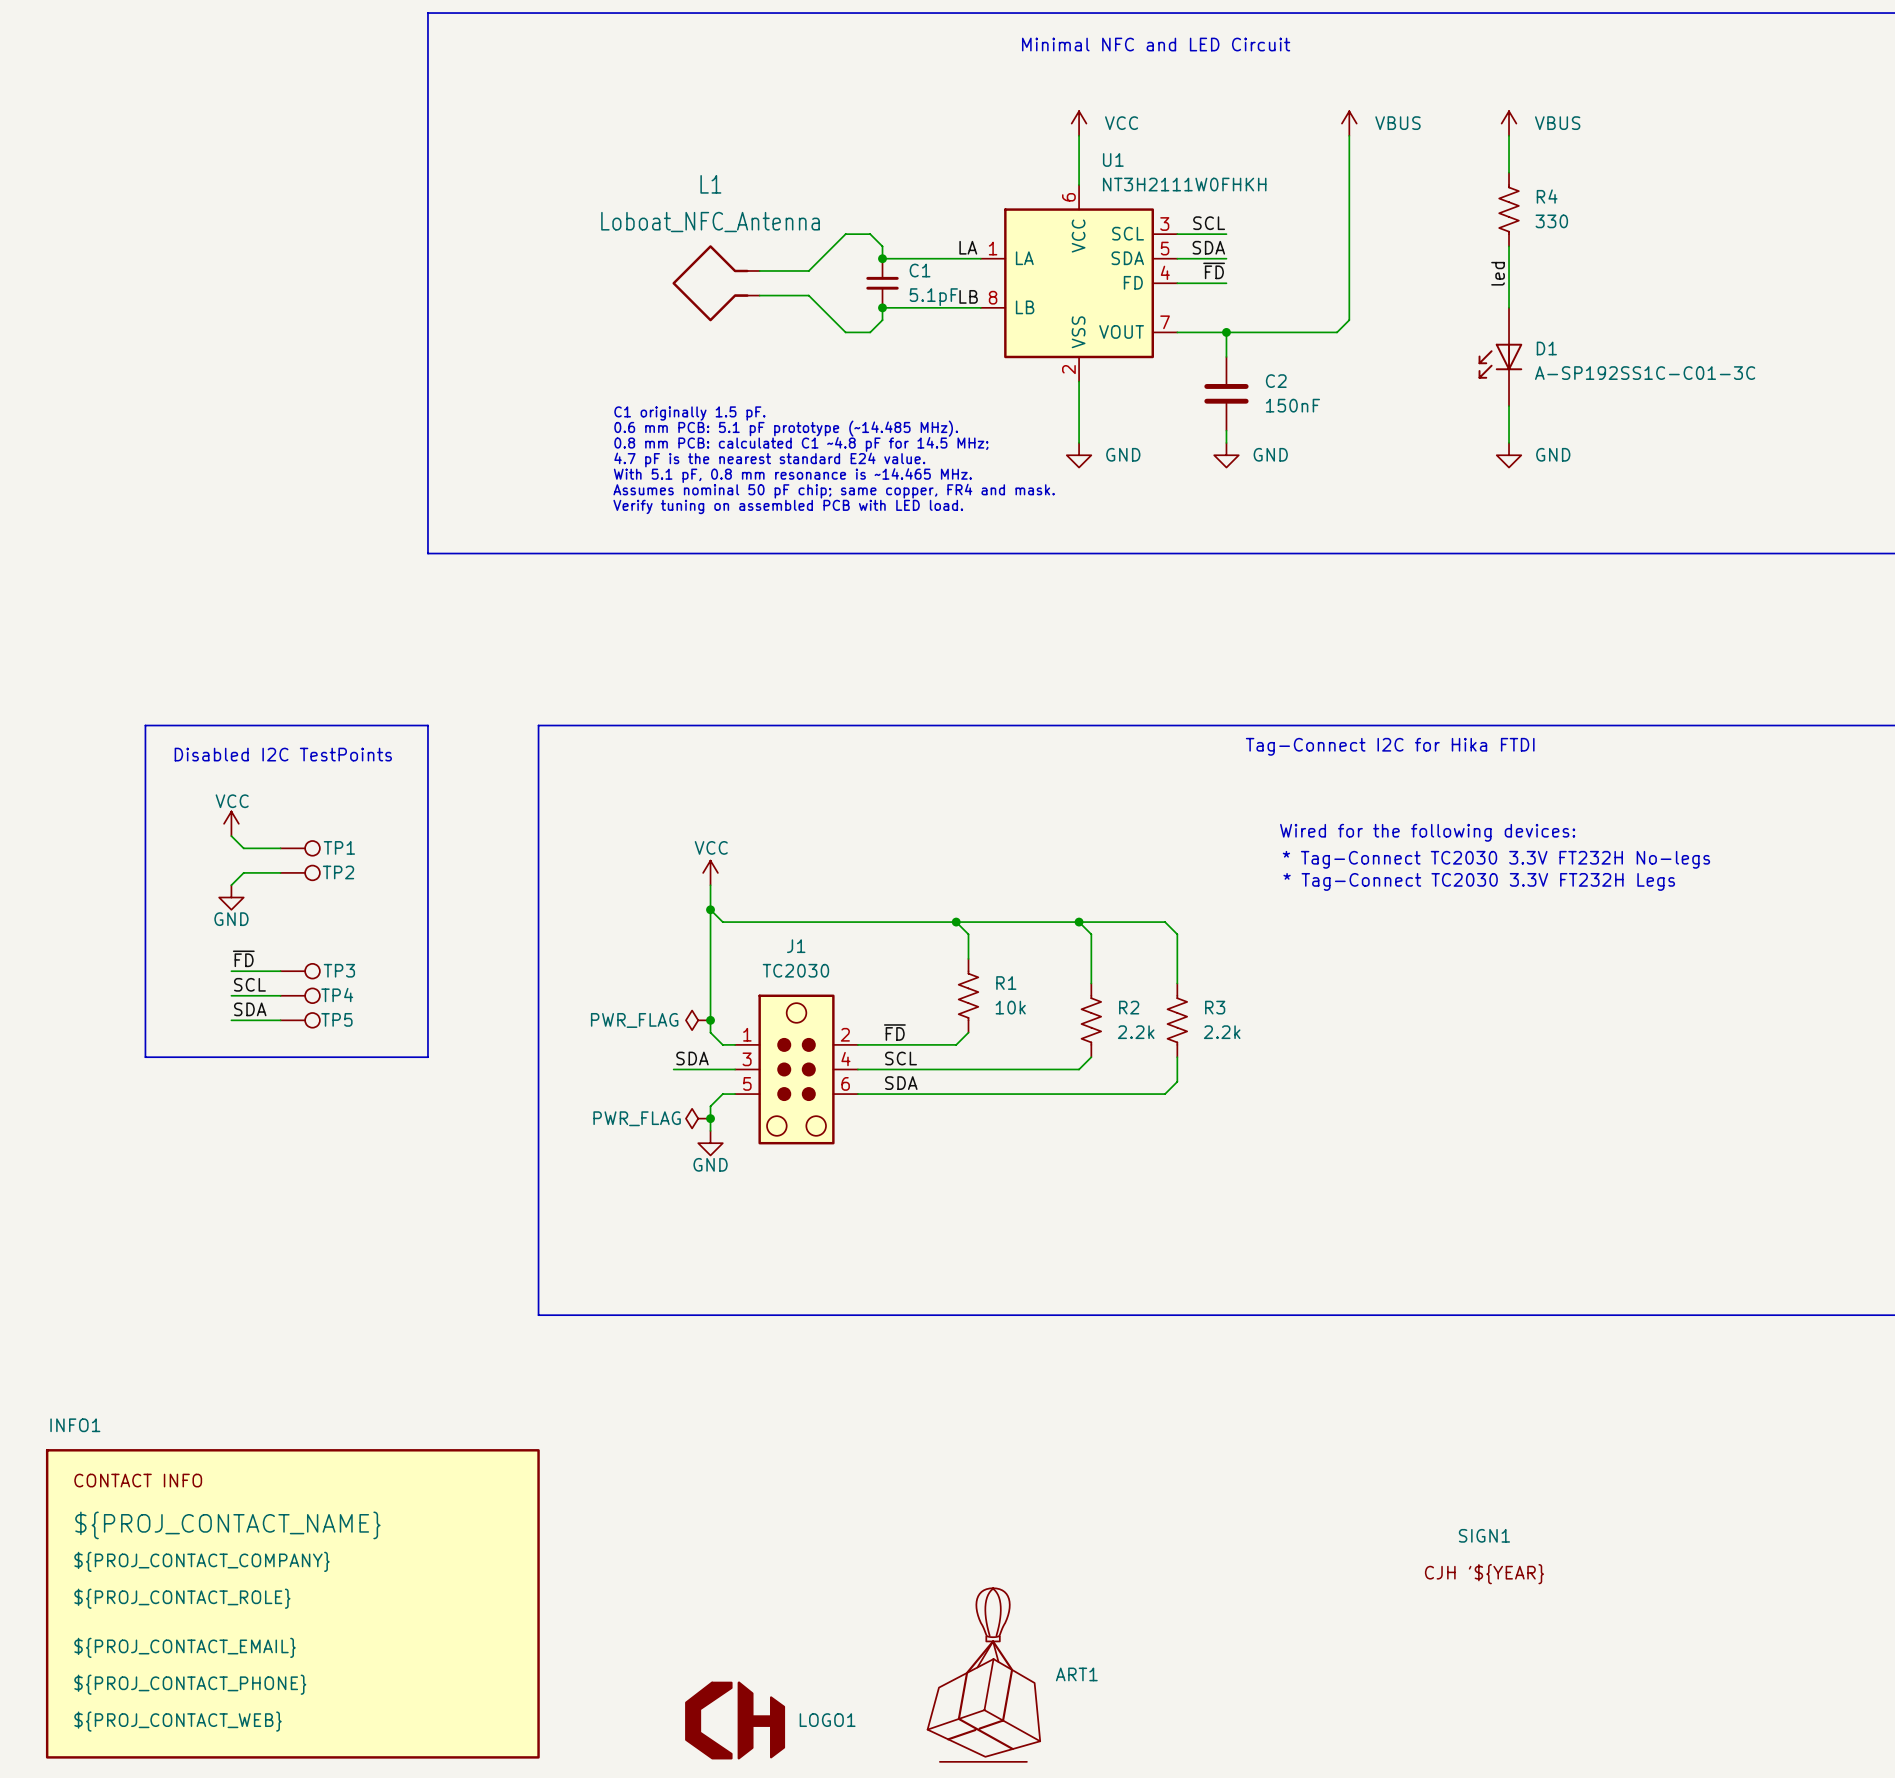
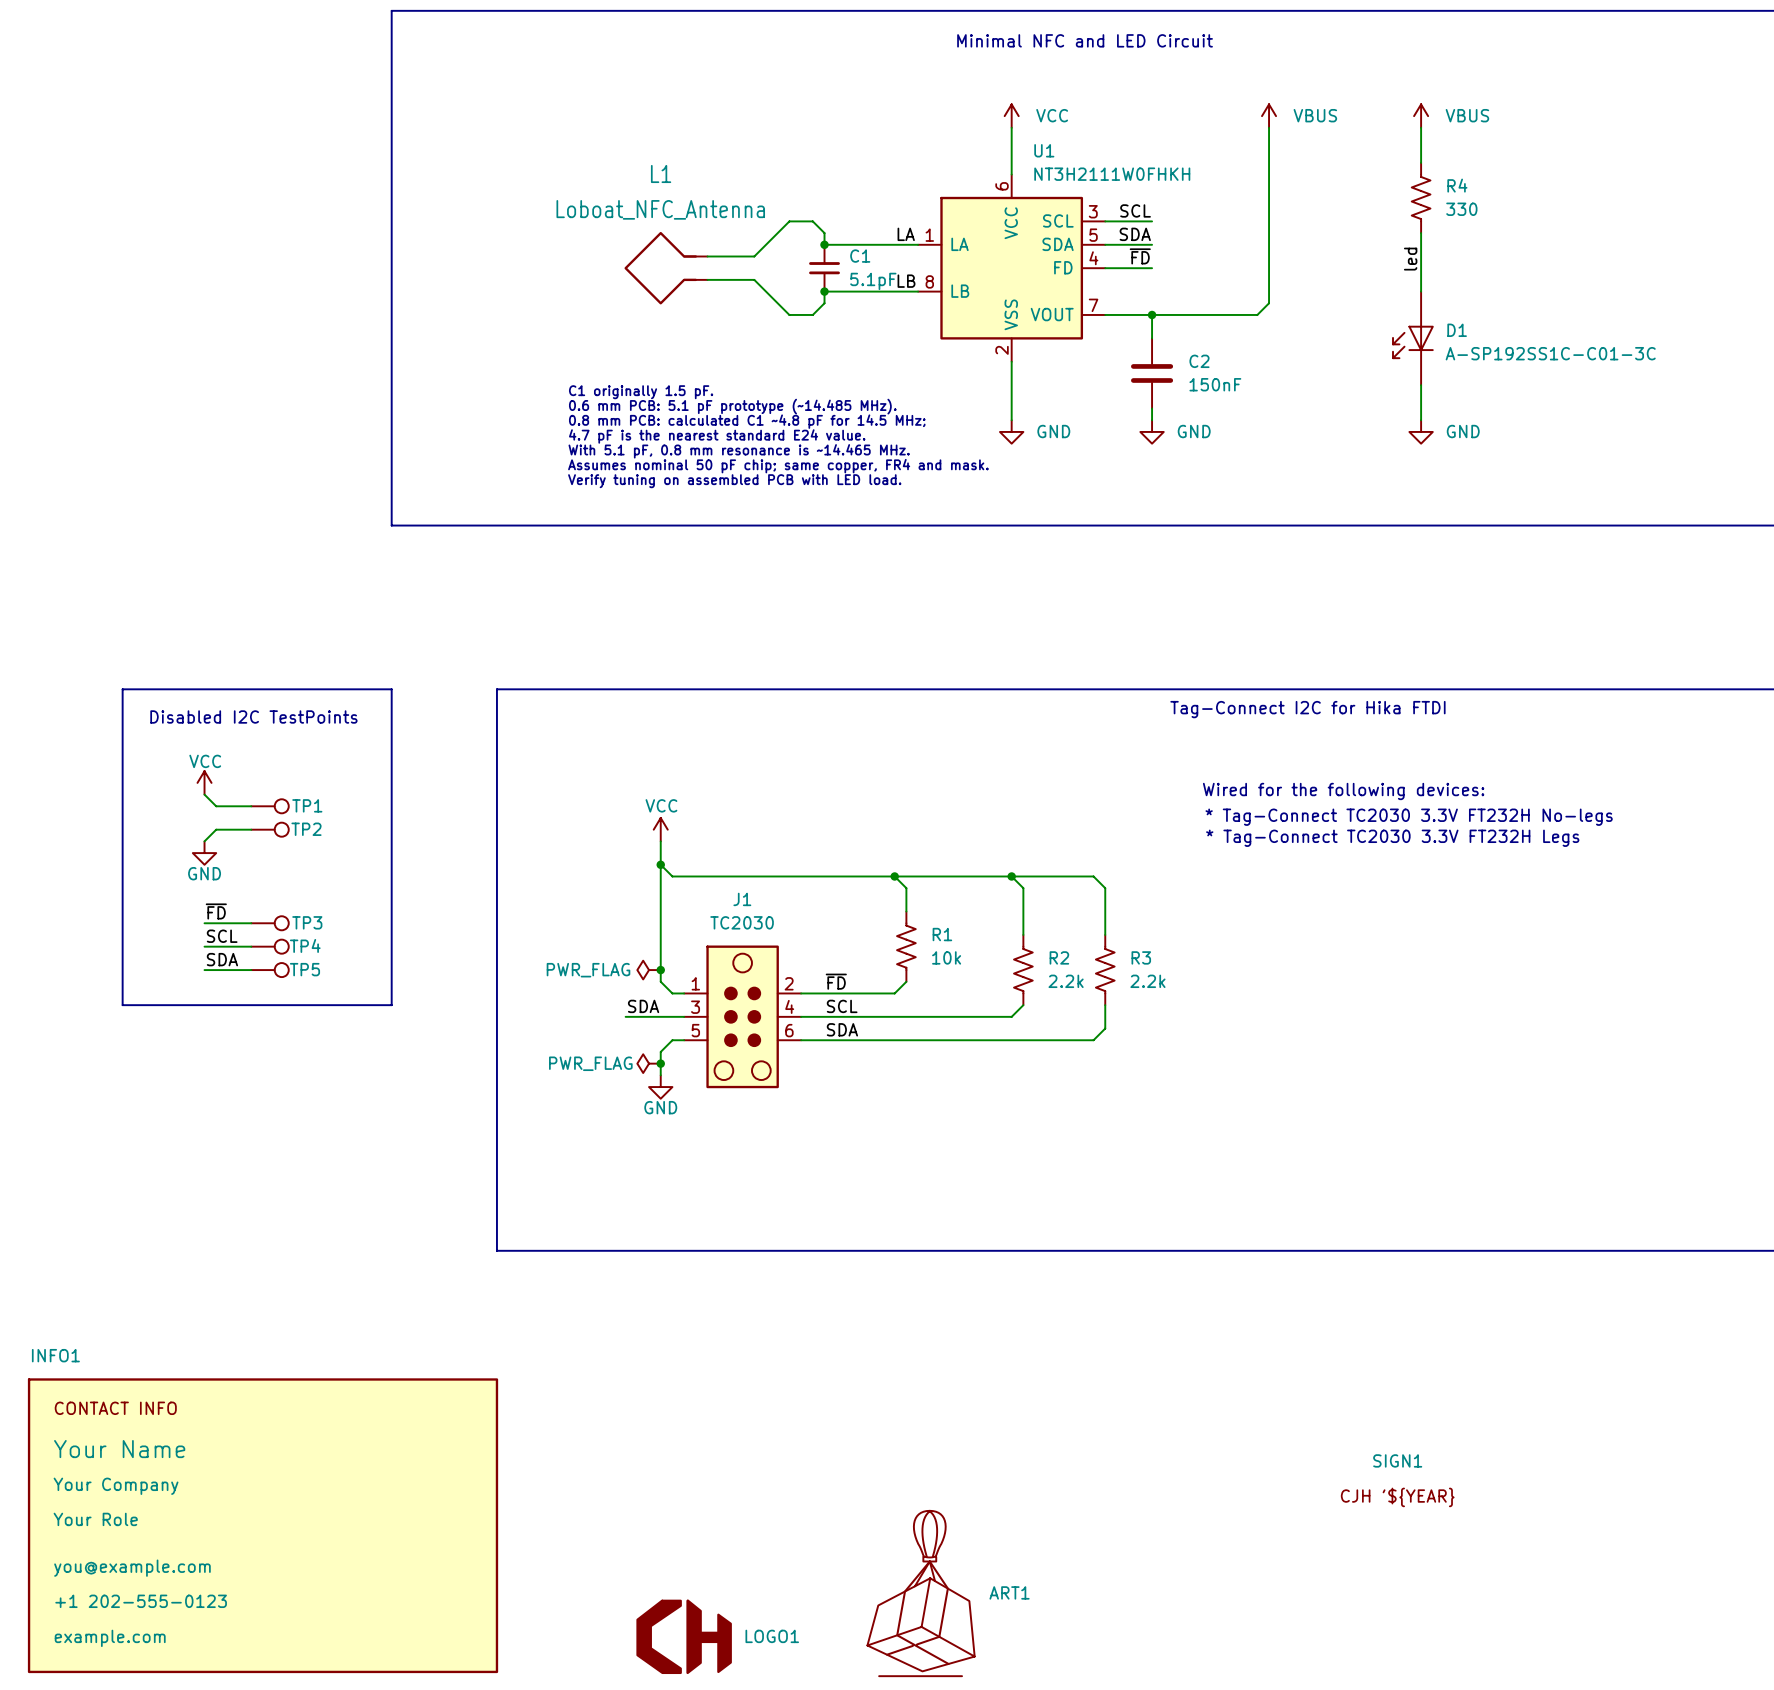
INFO1 text: ${PROJ_CONTACT_NAME} (227, 1525) -> Your Name (119, 1449)
INFO1 text: ${PROJ_CONTACT_COMPANY} (201, 1561) -> Your Company (116, 1486)
INFO1 text: ${PROJ_CONTACT_ROLE} (182, 1598) -> Your Role (95, 1519)
INFO1 text: ${PROJ_CONTACT_EMAIL} (185, 1647) -> you@example.com (132, 1568)
INFO1 text: ${PROJ_CONTACT_PHONE} (190, 1684) -> +1 202-555-0123 (141, 1601)
INFO1 text: ${PROJ_CONTACT_WEB} (177, 1721) -> example.com (110, 1638)

